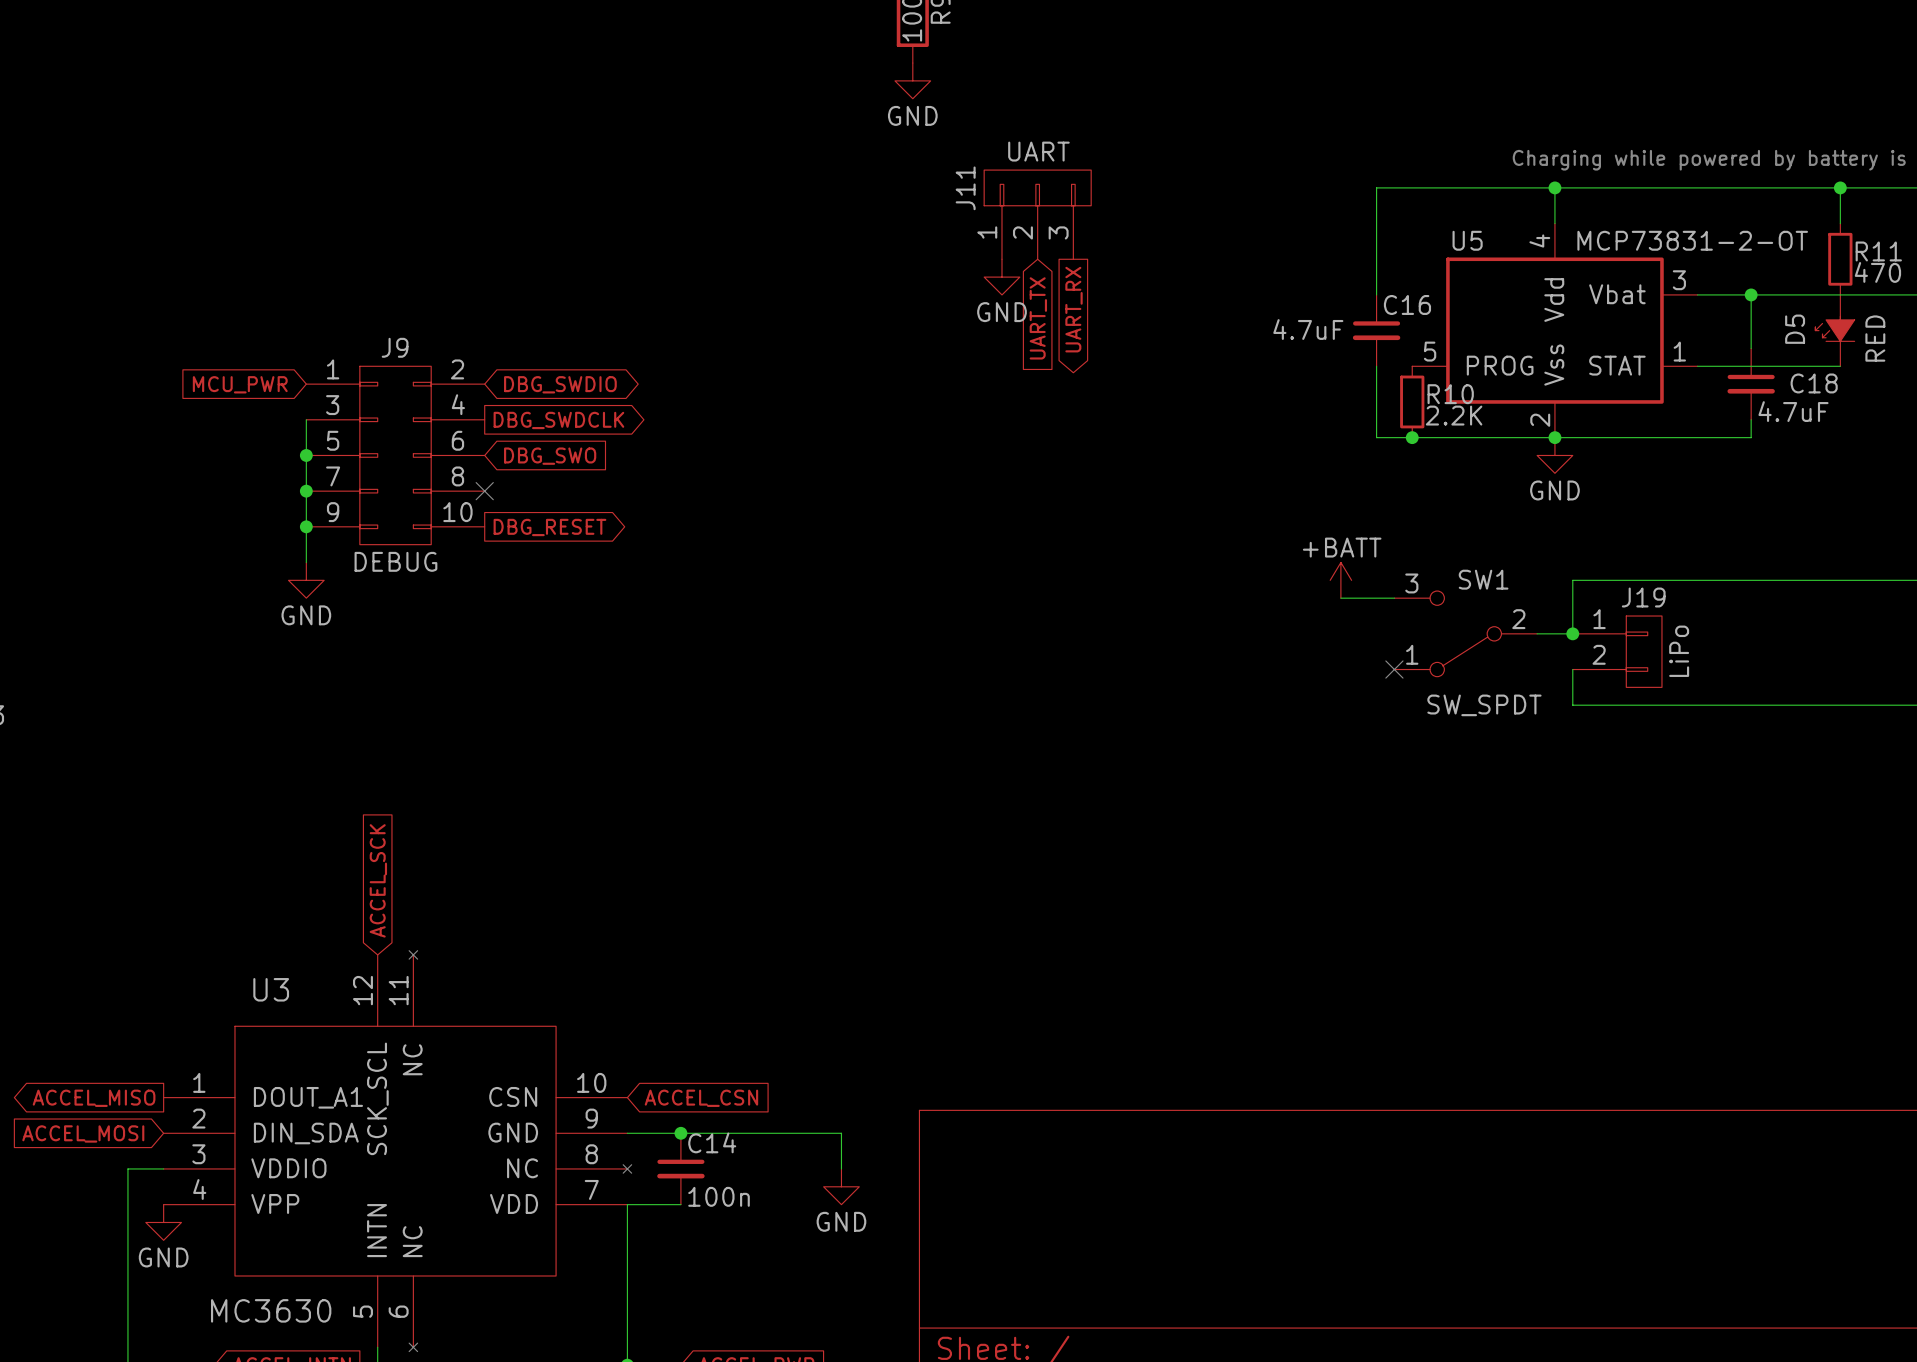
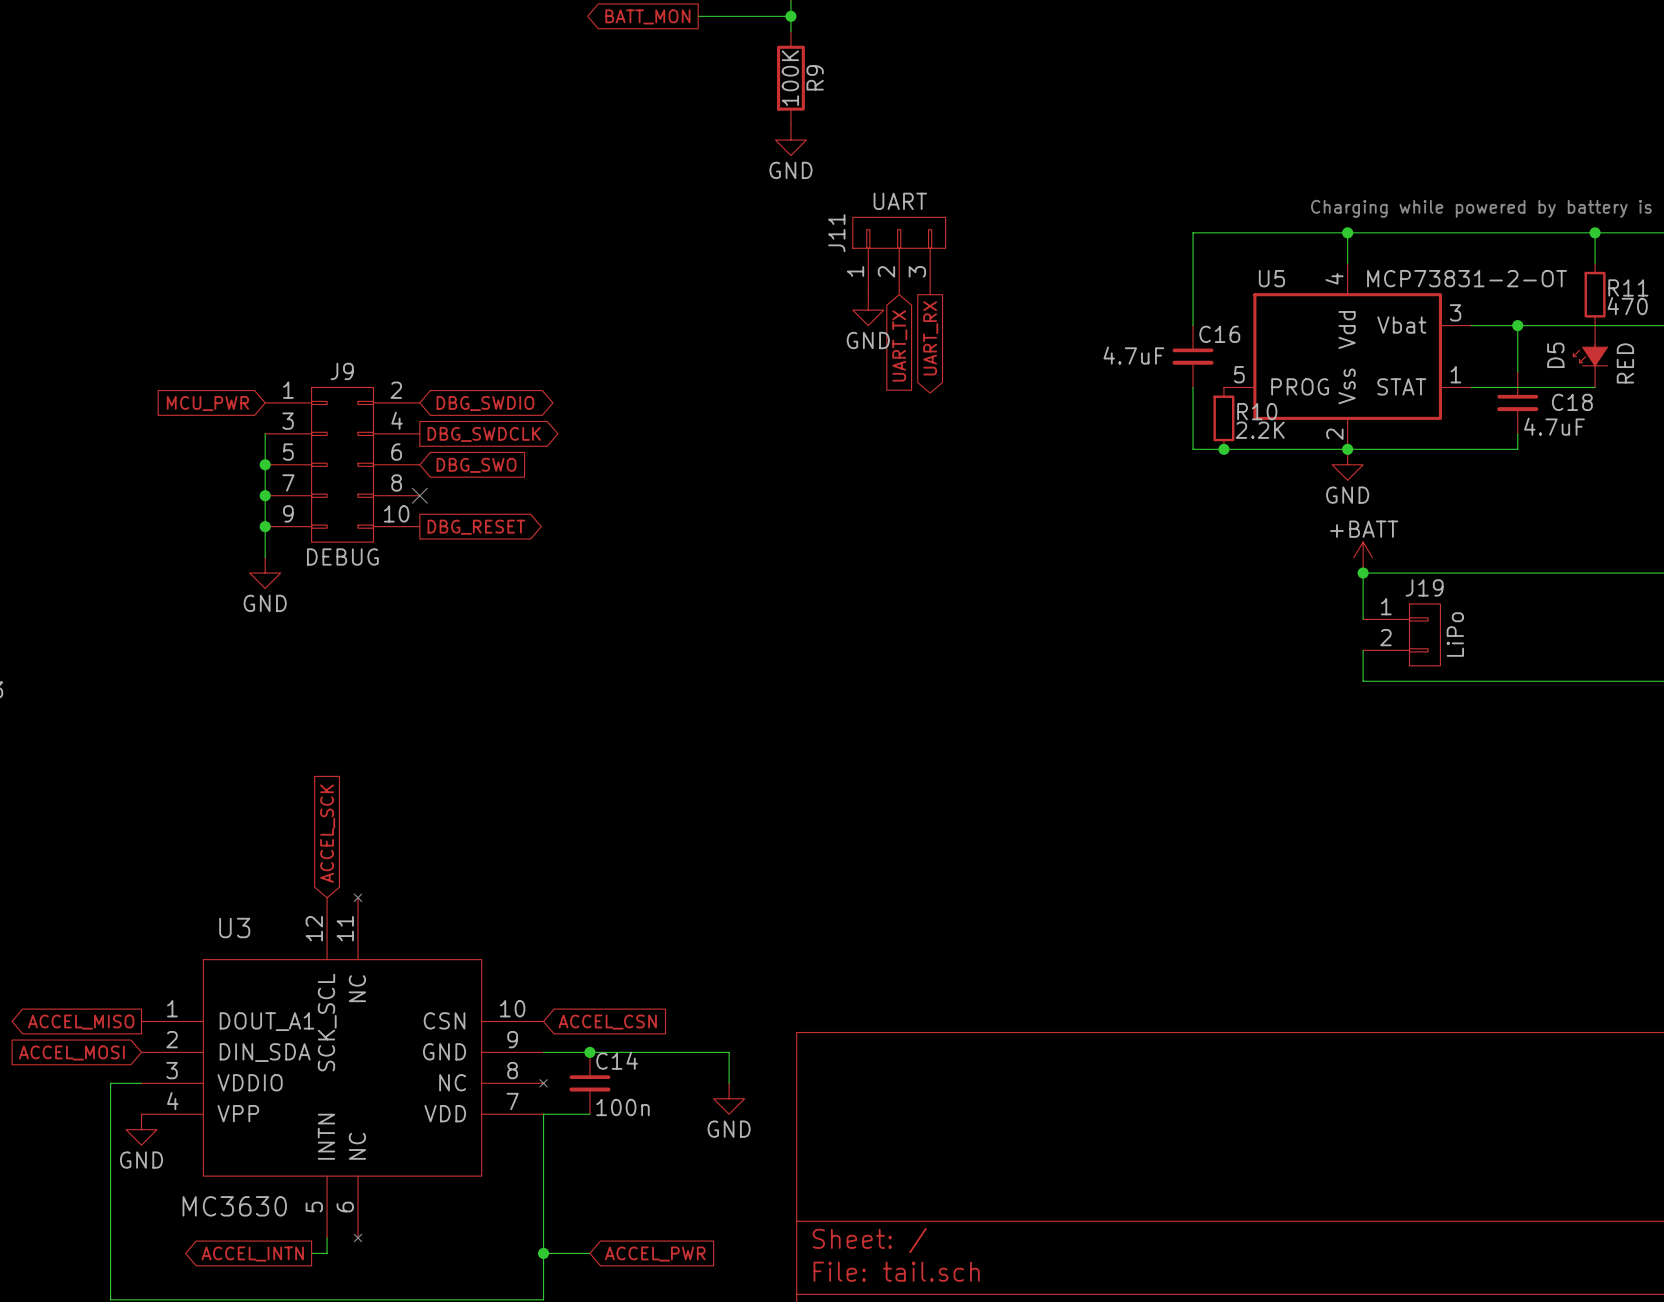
power symbol position: +BATT (1340, 580) -> +BATT (1363, 557)
wire: (1340, 598) (1394, 598) -> none
SW1: SW_SPDT (1465, 633) -> none
wire: (1537, 633) (1572, 633) -> none
junction position: (1572, 633) -> (1363, 573)
no-connect mark: (1394, 669) -> none

